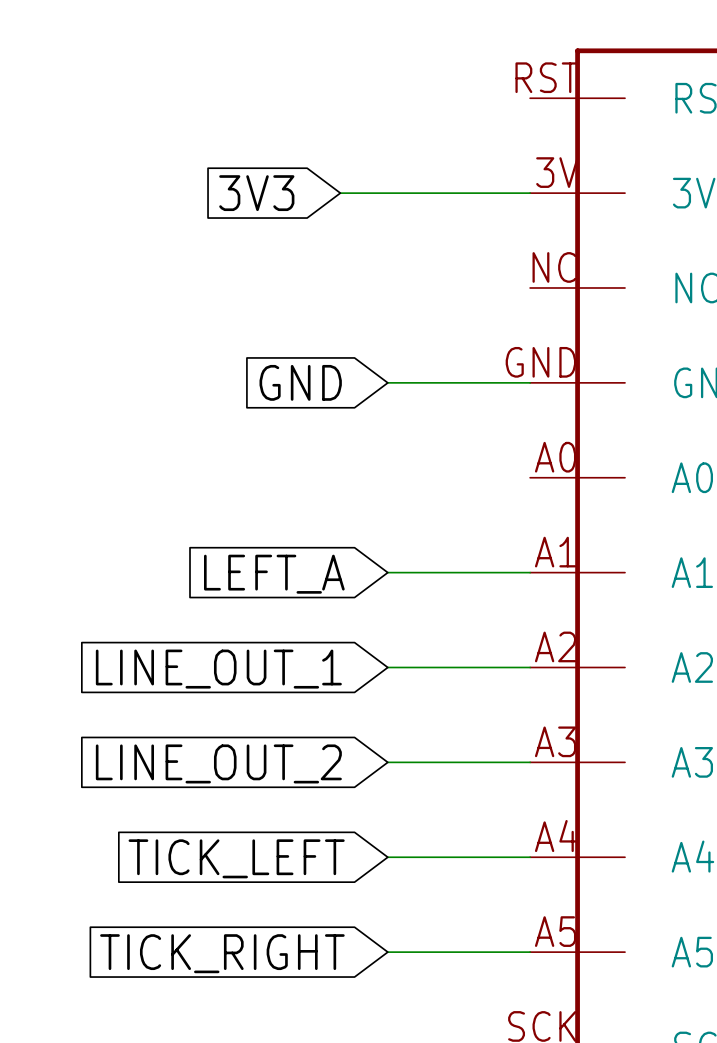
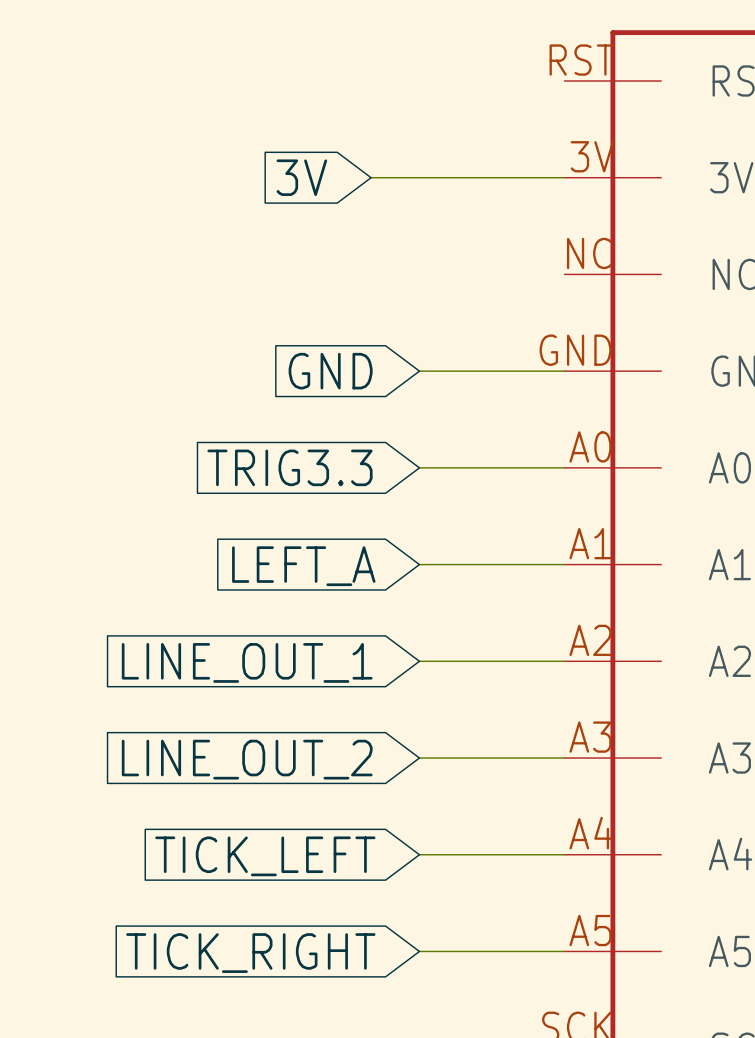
global label: 3V3 (256, 193) -> 3V (301, 177)
global label: none -> TRIG3.3 (290, 467)
wire: none -> (419, 467) (564, 467)

